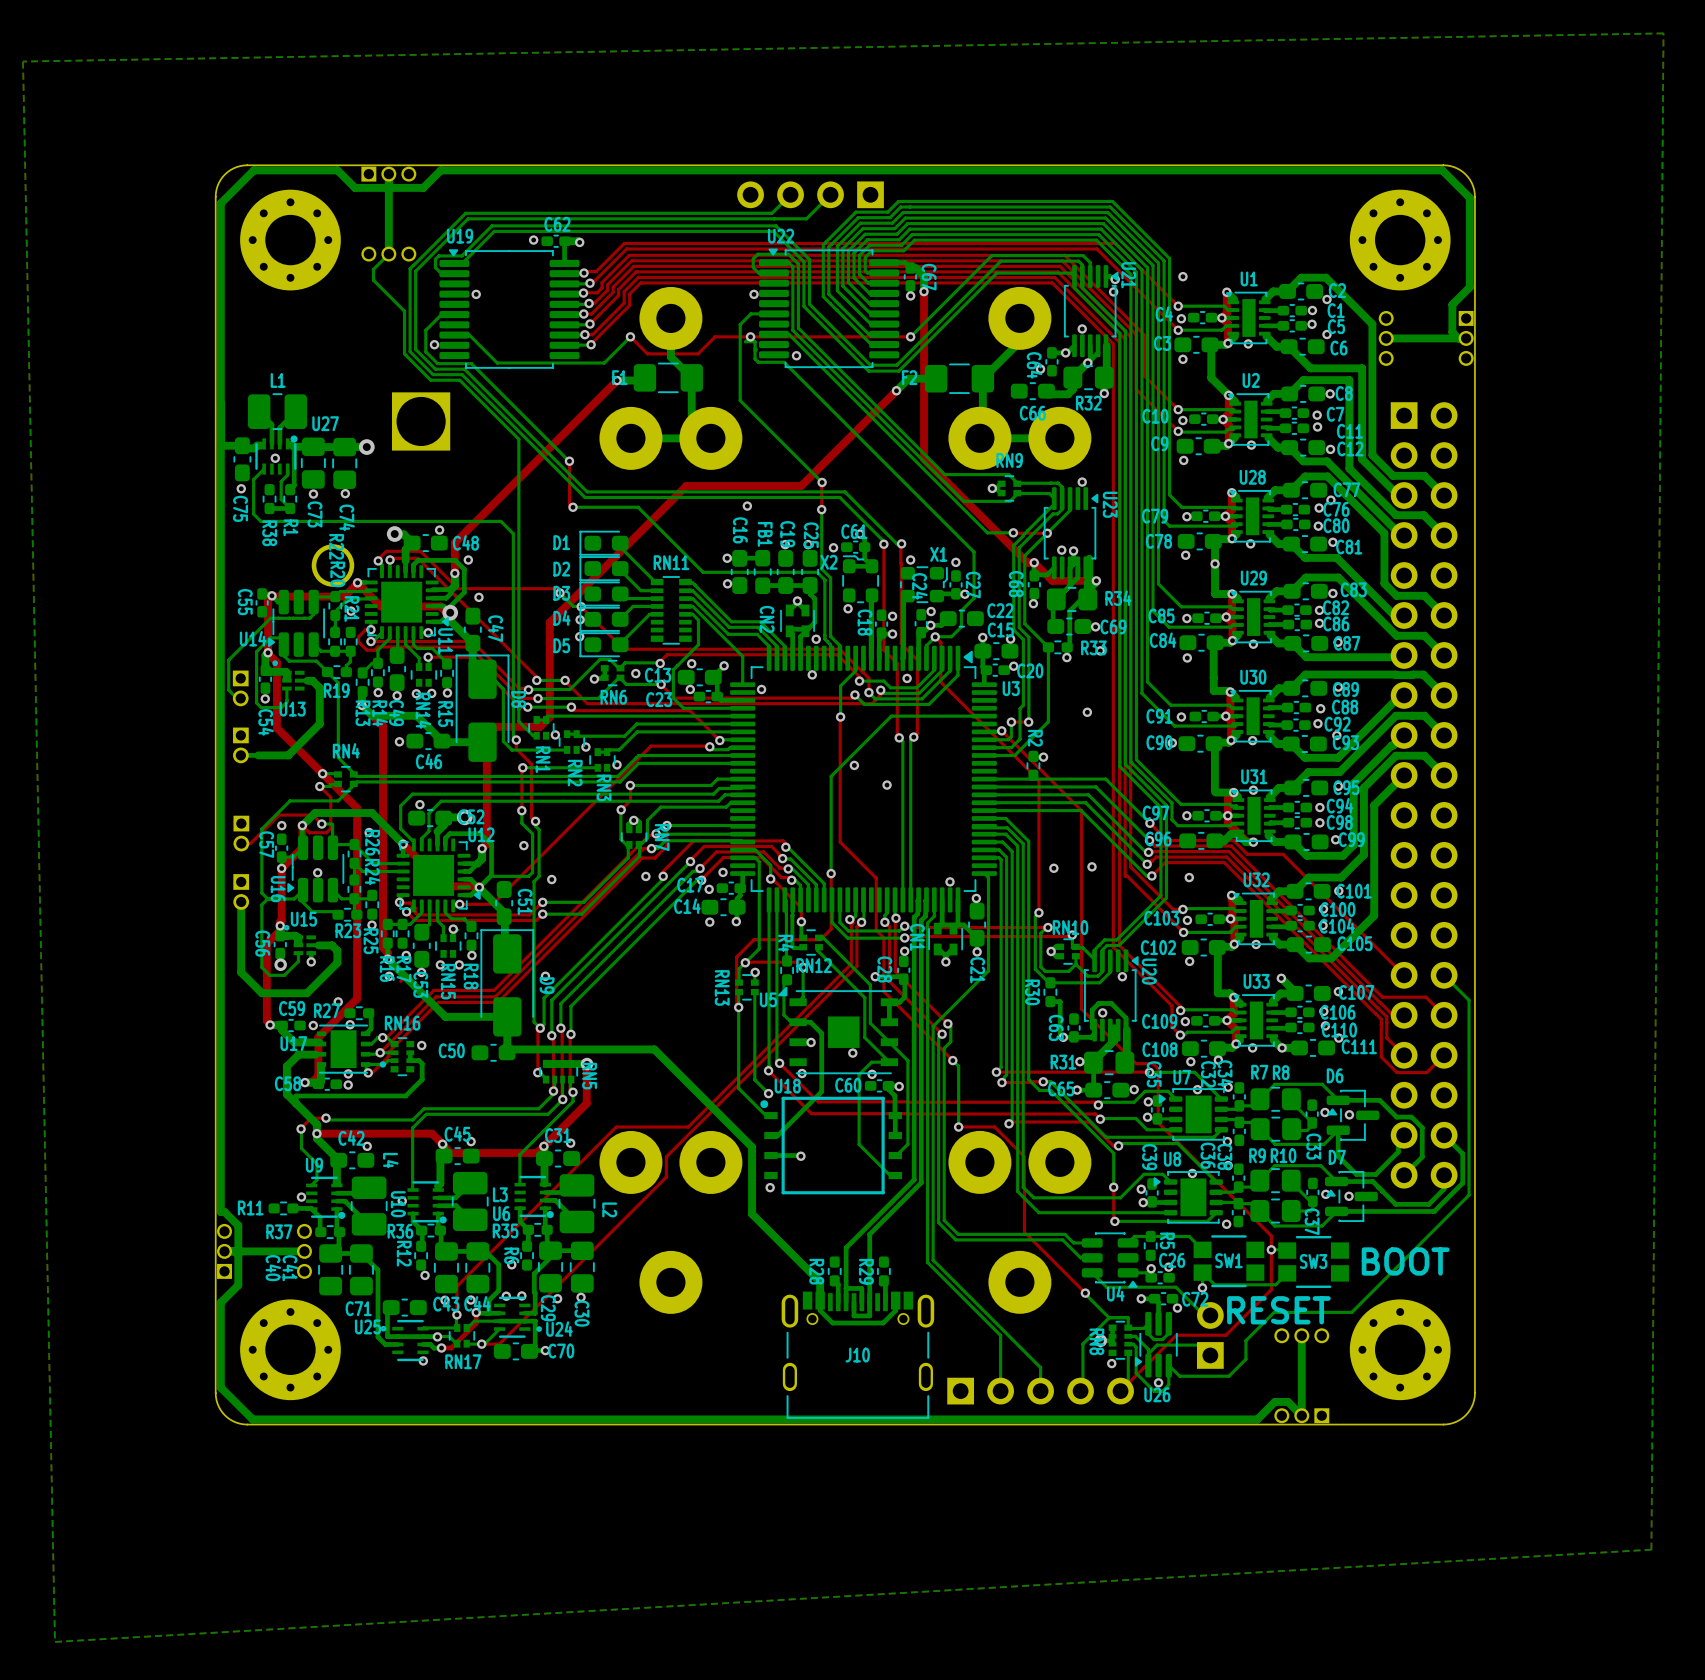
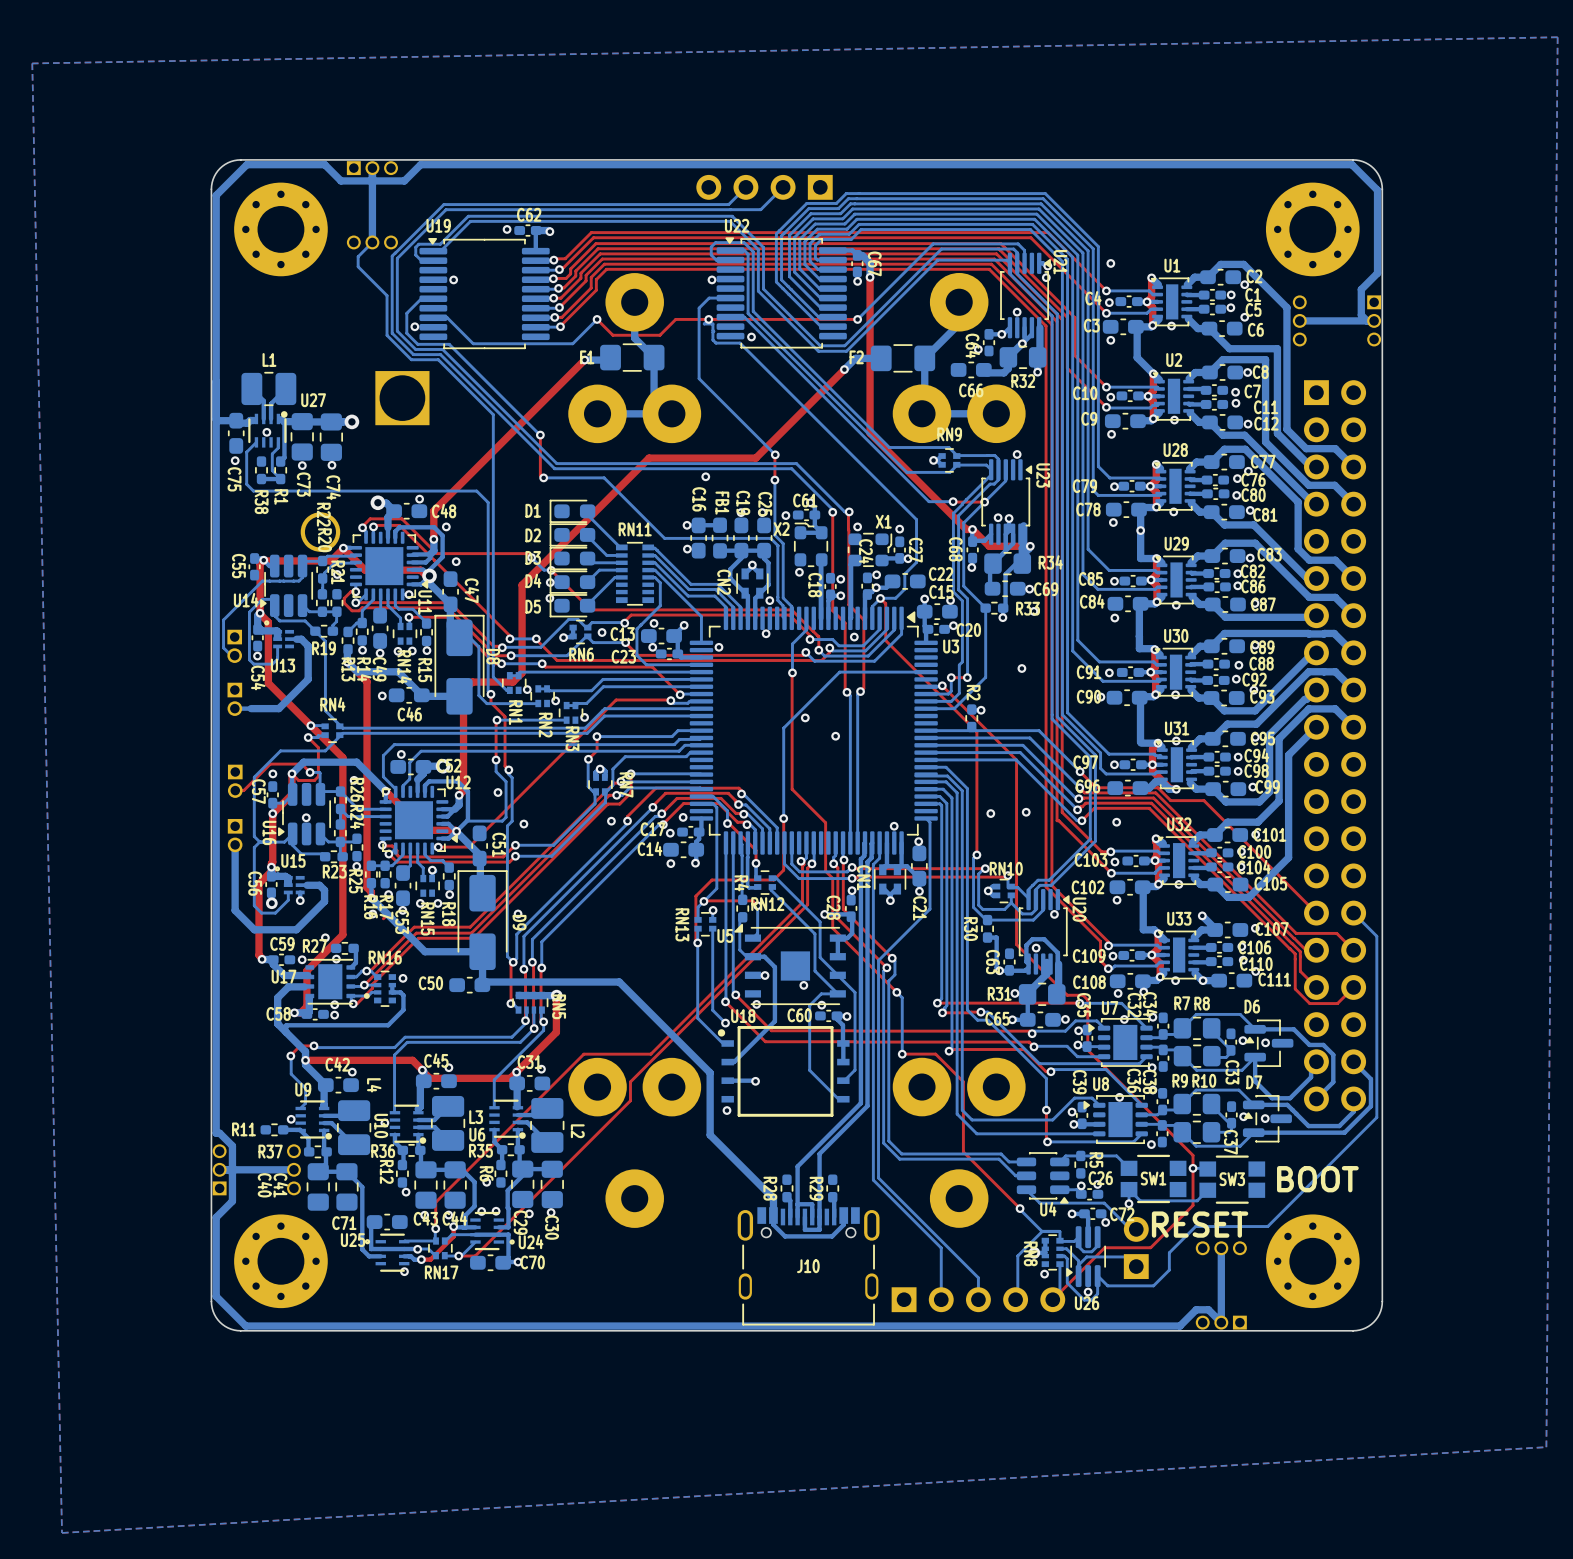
bottom track: (805, 631) (803, 629) (791, 629) (789, 631) -> (741, 550) (741, 558) (730, 569) (730, 578) (745, 593)

